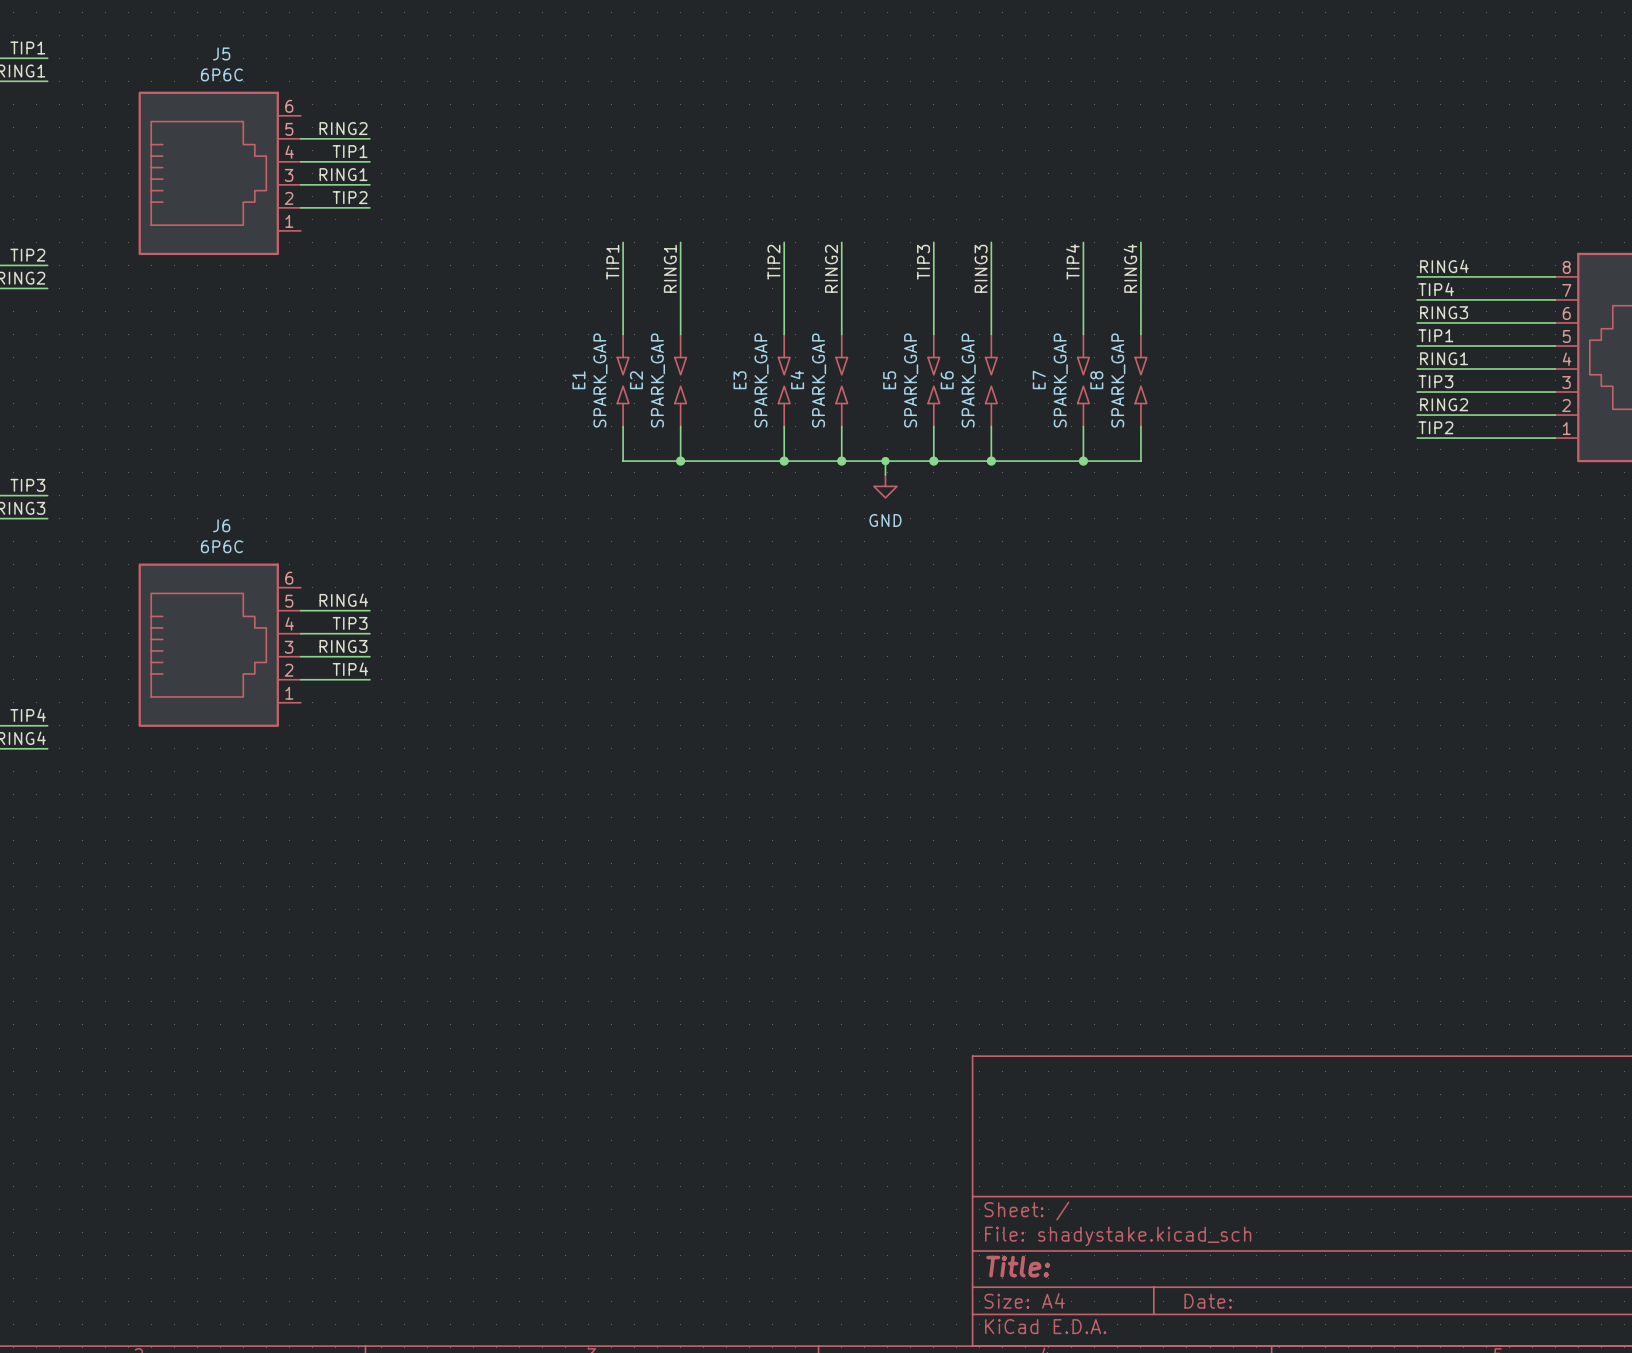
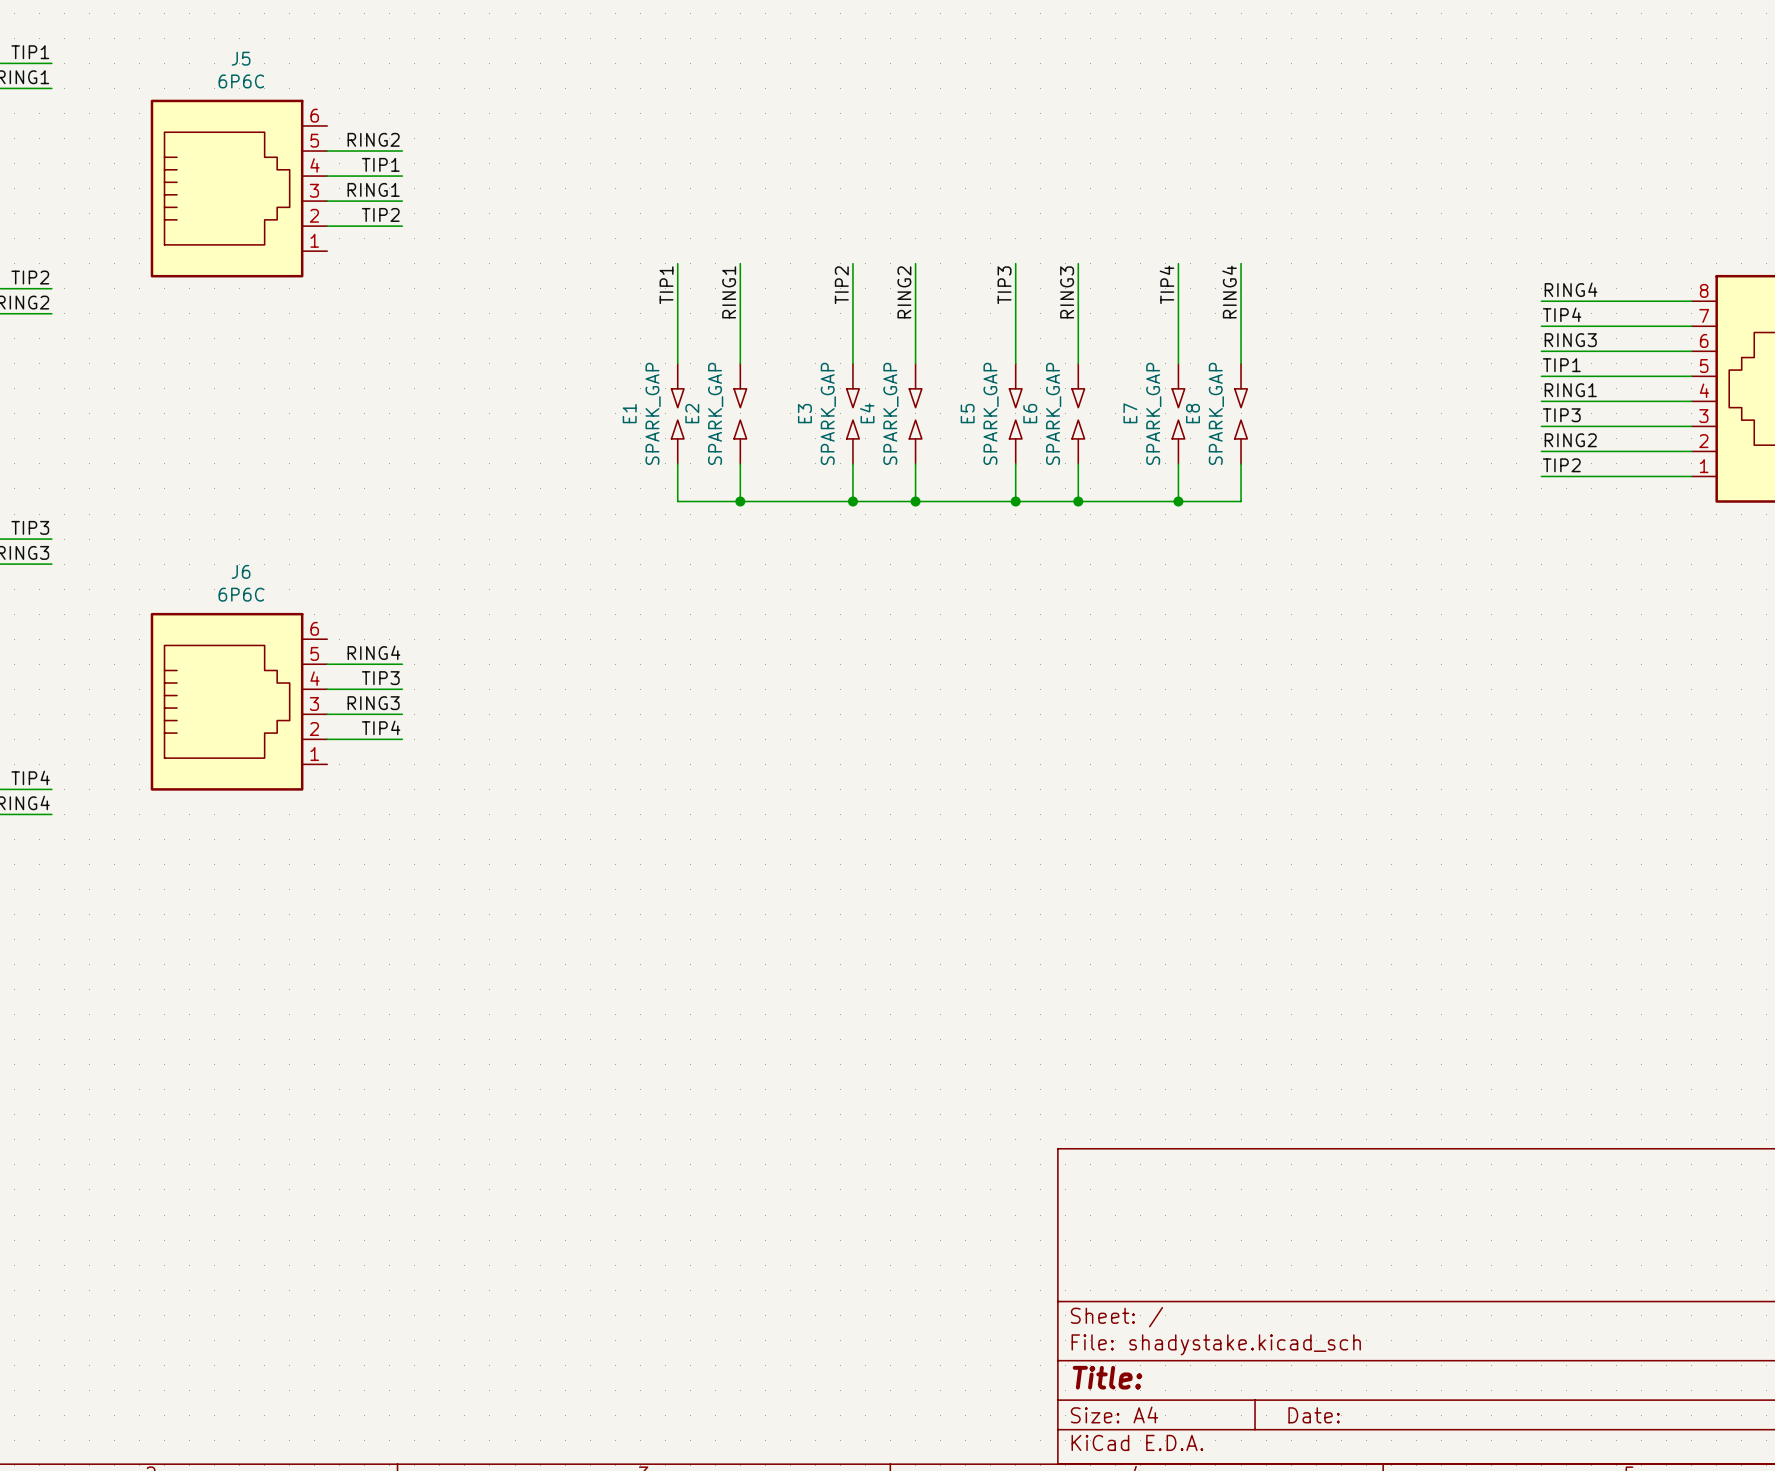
wire: (885, 461) (885, 474) -> none
junction: (885, 461) -> none
power symbol: GND (885, 486) -> none

